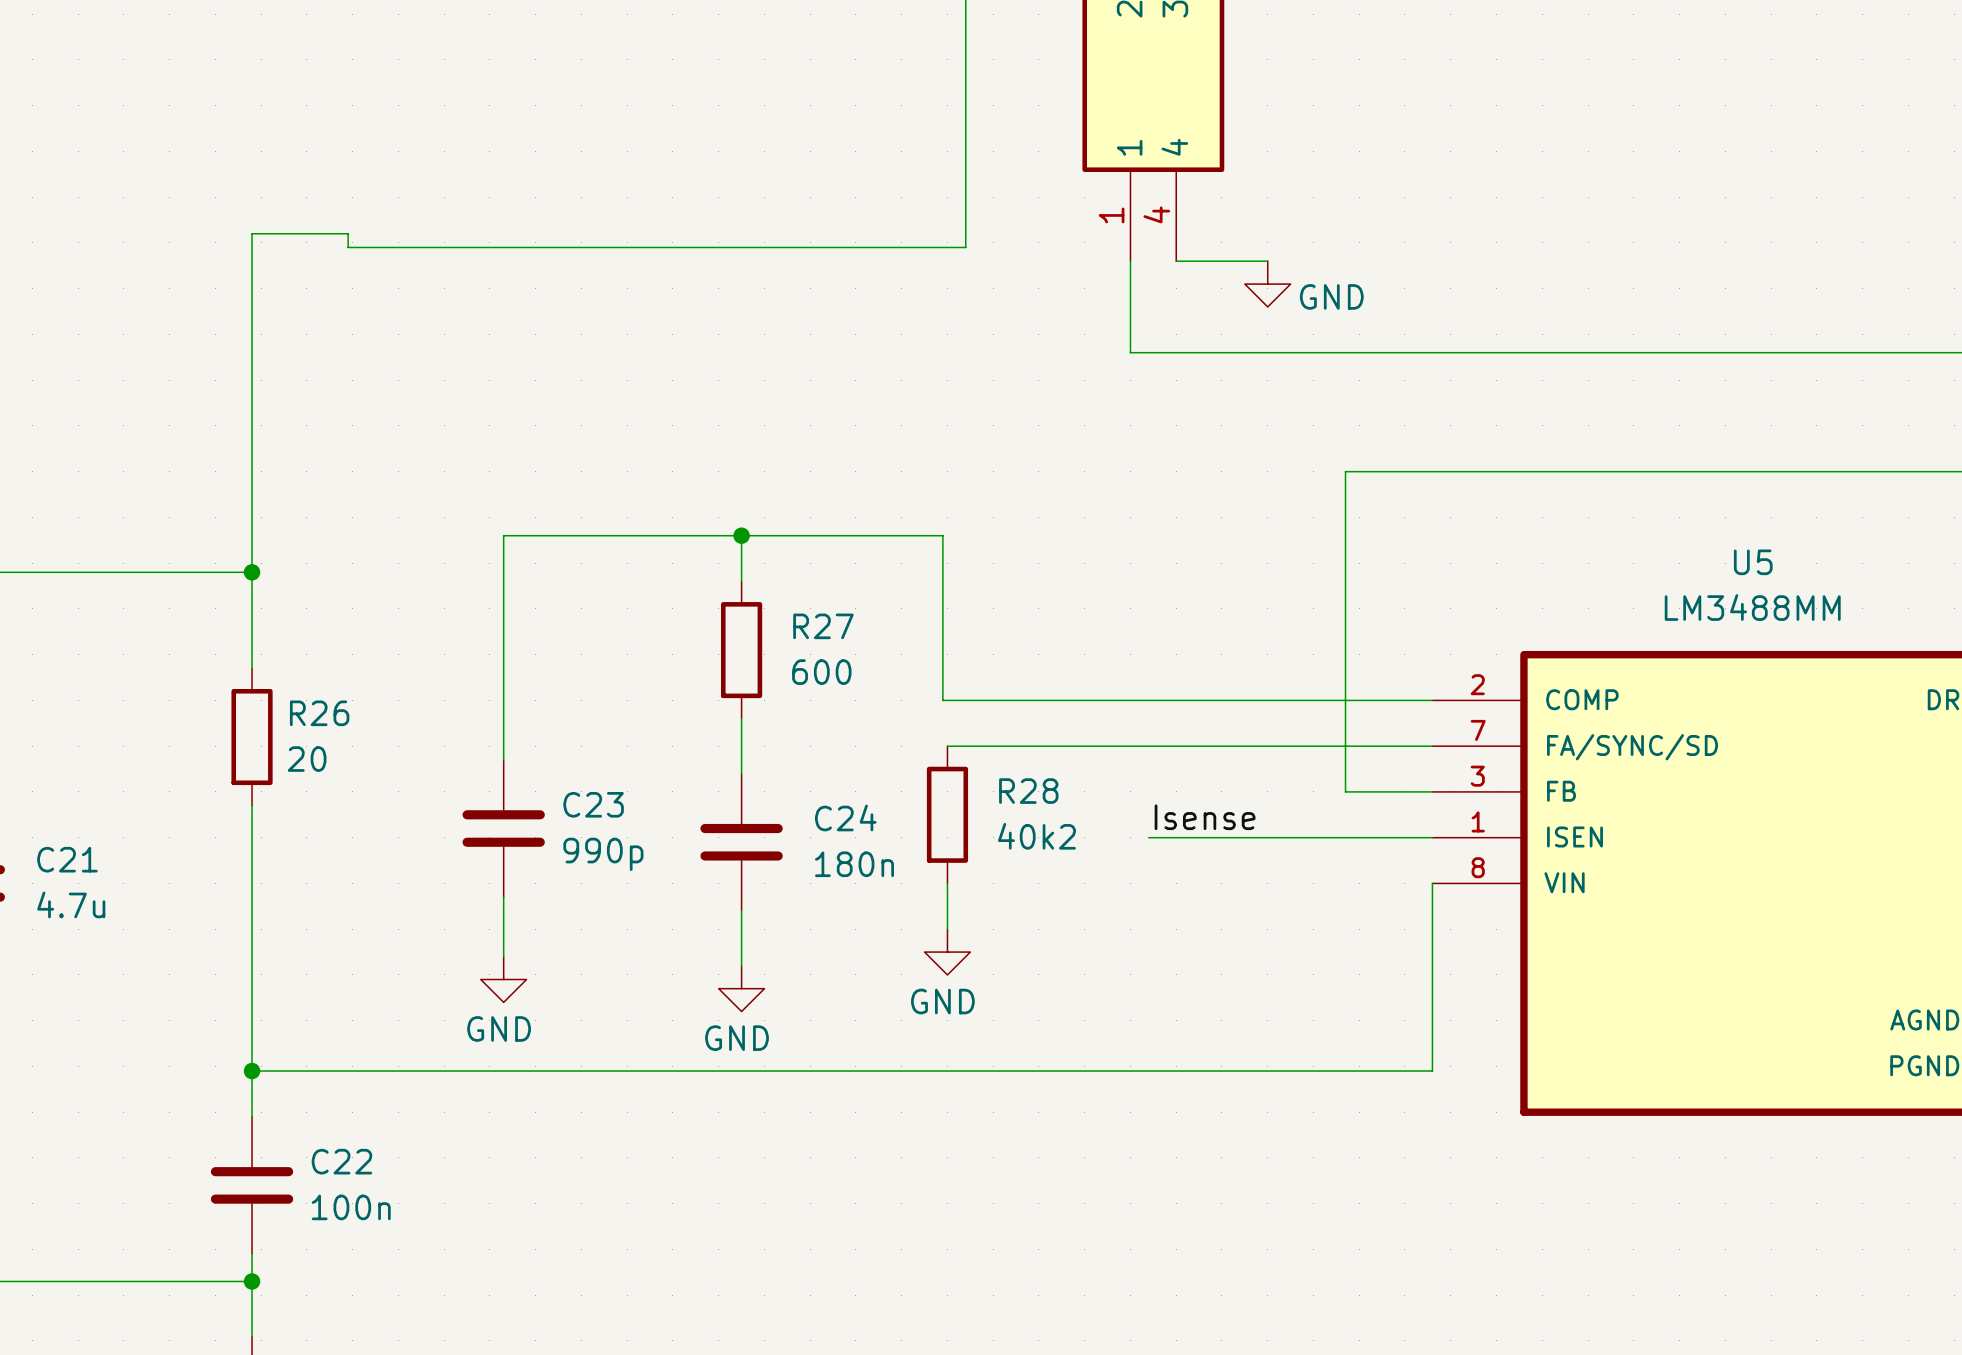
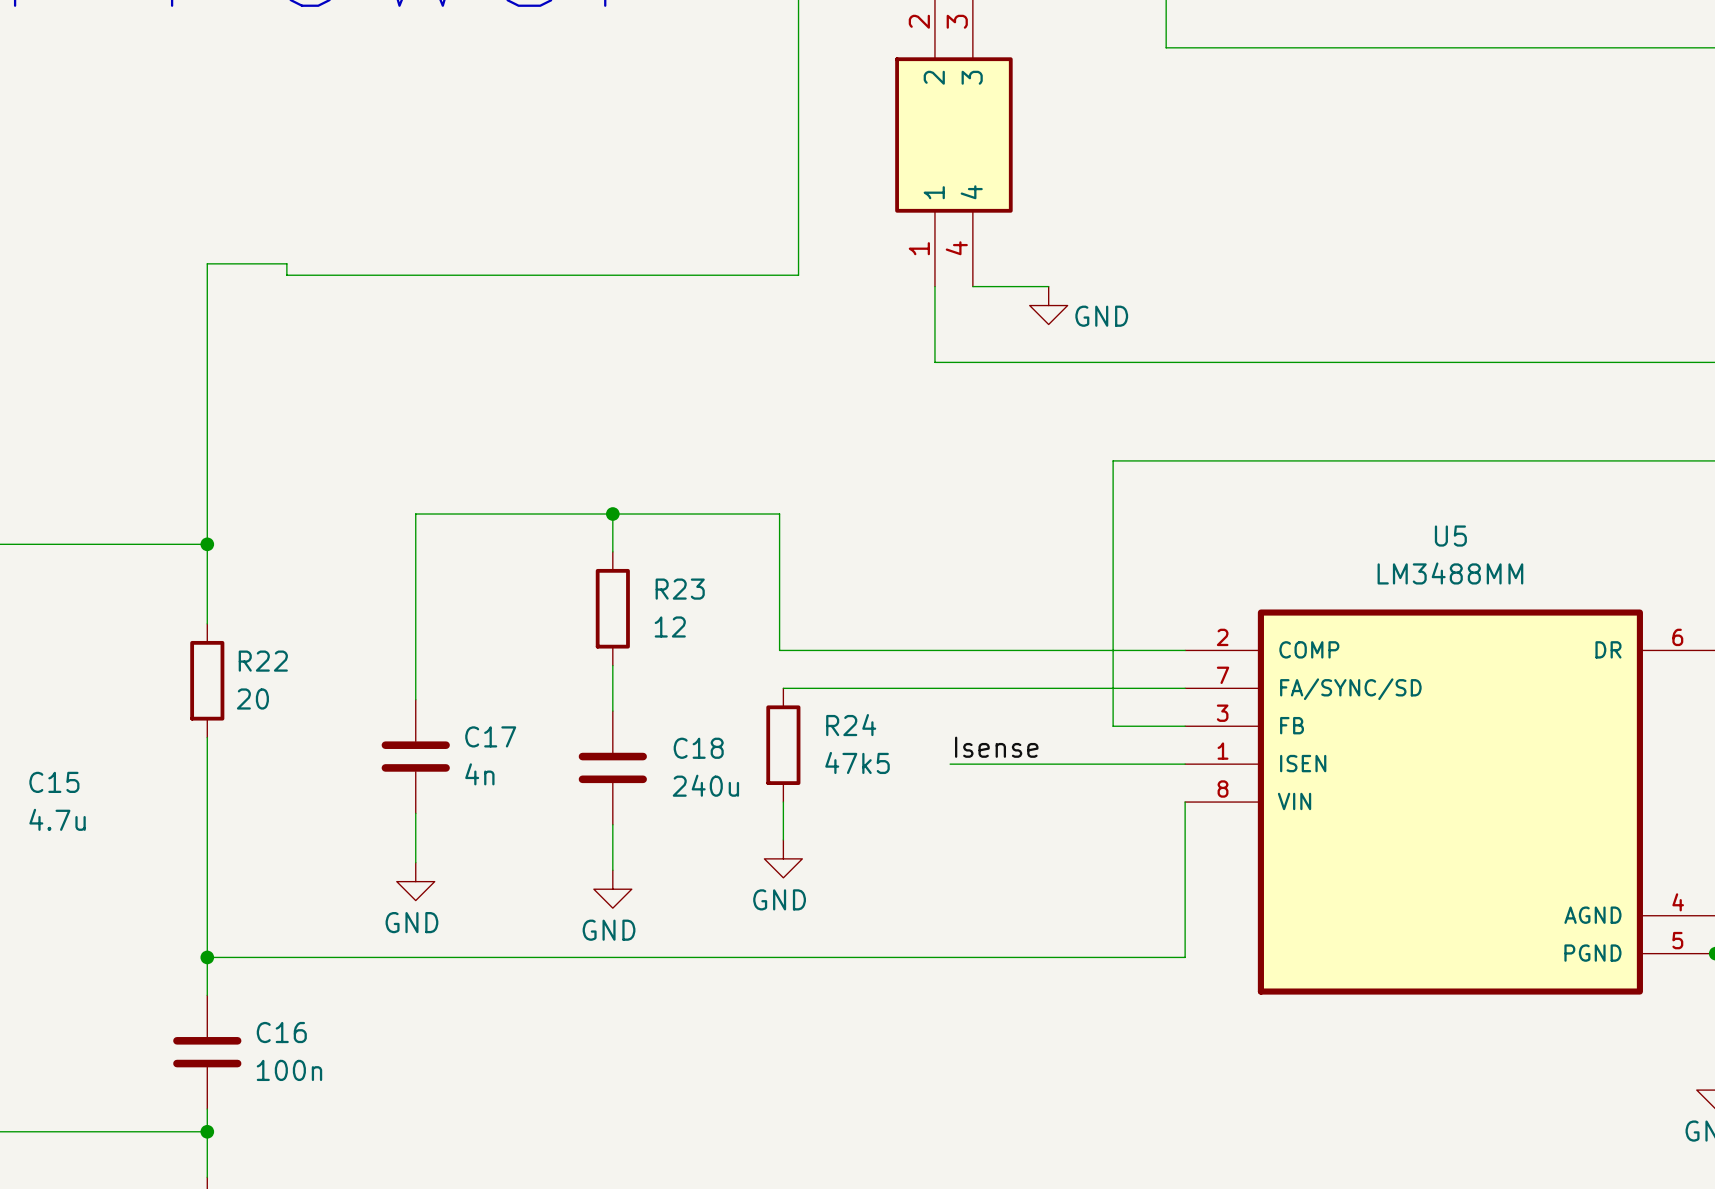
R27 name: R27 (823, 626) -> R23 (680, 589)
R27 value: 600 (821, 672) -> 12 (670, 626)
R26 name: R26 (319, 713) -> R22 (263, 661)
R28 name: R28 (1028, 791) -> R24 (851, 725)
C23 name: C23 (593, 804) -> C17 (490, 736)
C24 name: C24 (845, 817) -> C18 (698, 748)
R28 value: 40k2 (1036, 836) -> 47k5 (857, 762)
C23 value: 990p (603, 854) -> 4n (479, 774)
C21 name: C21 (67, 859) -> C15 (54, 782)
C24 value: 180n (854, 864) -> 240u (705, 785)
C22 name: C22 (341, 1161) -> C16 (281, 1032)

